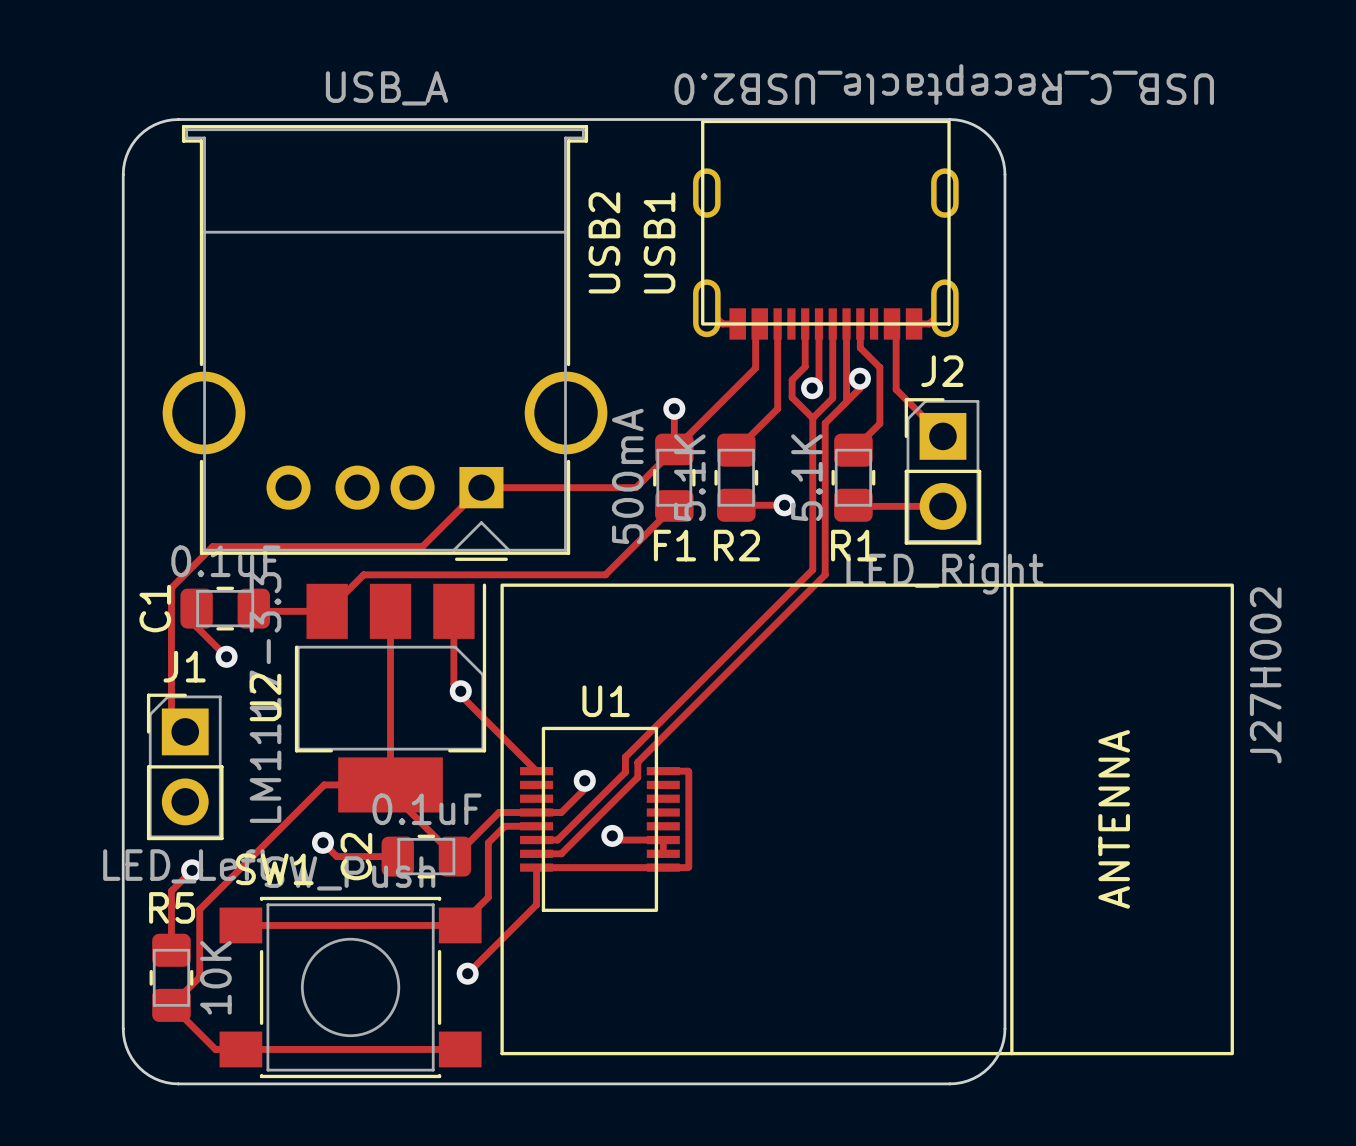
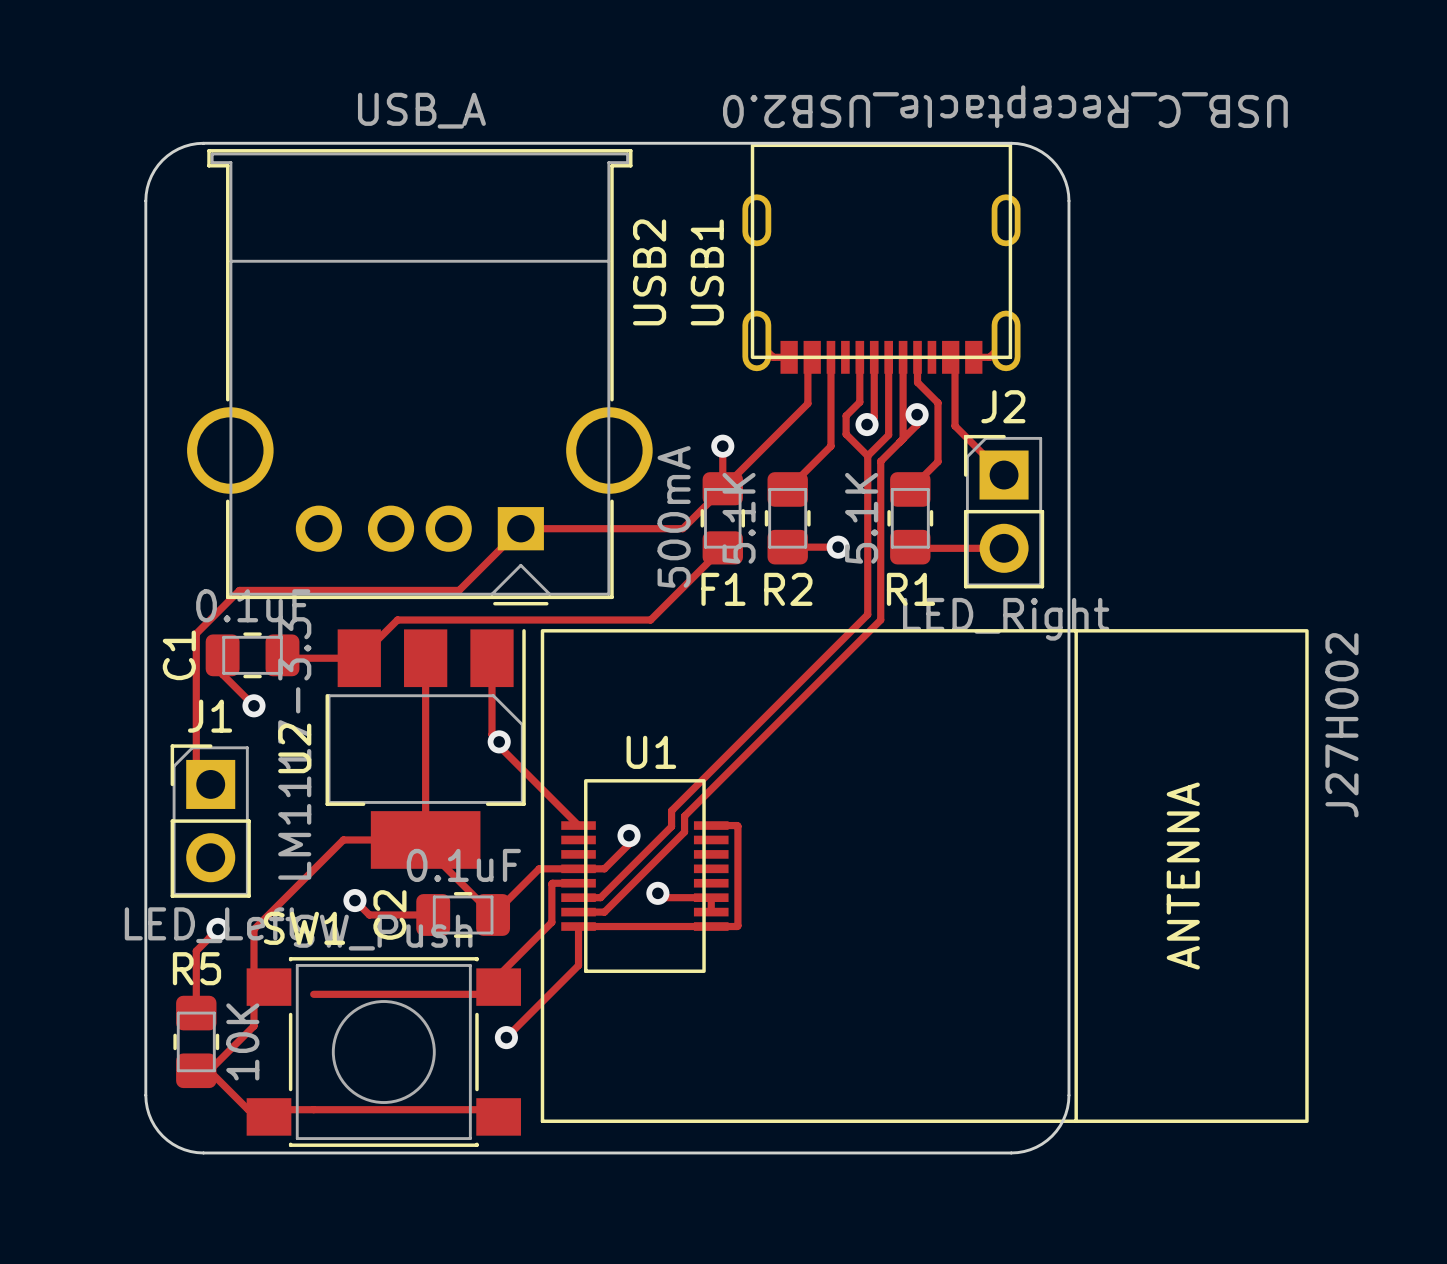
track: (324, 784) (199, 909) (199, 977) (171, 1005) (215, 1049) (460, 1049) -> (356, 839) (343, 839) (253, 929) (253, 1026) (209, 1070) (248, 1109) (479, 1109)
track: (511, 826) (504, 826) (488, 842) (488, 897) (460, 925) (240, 925) -> (552, 883) (551, 922) (479, 994) (313, 994)

